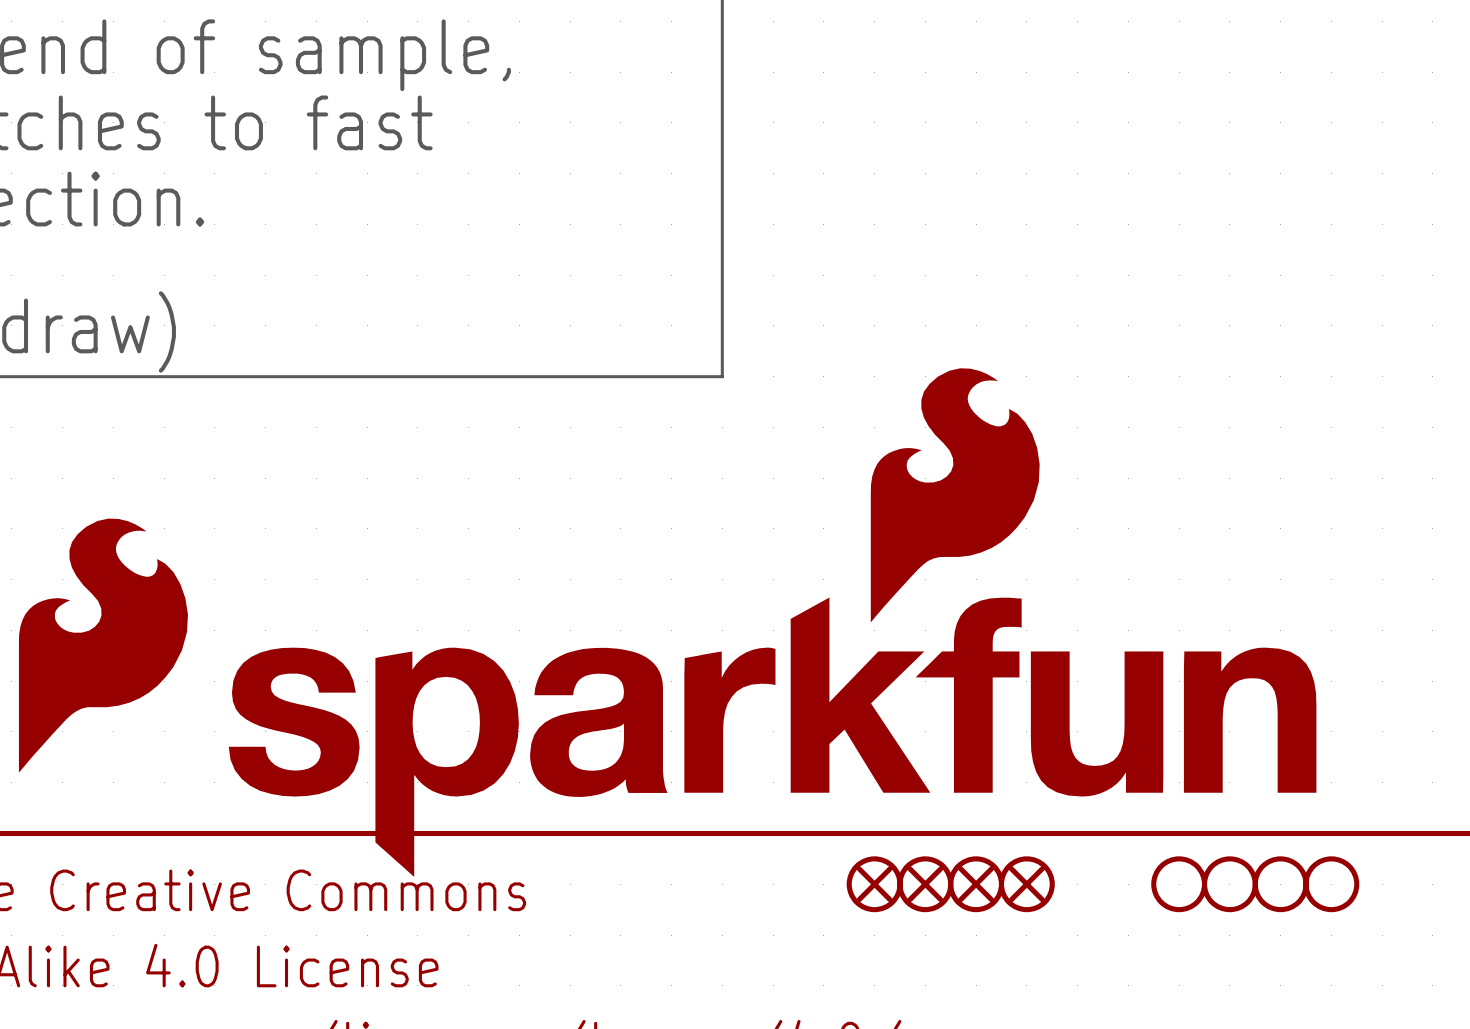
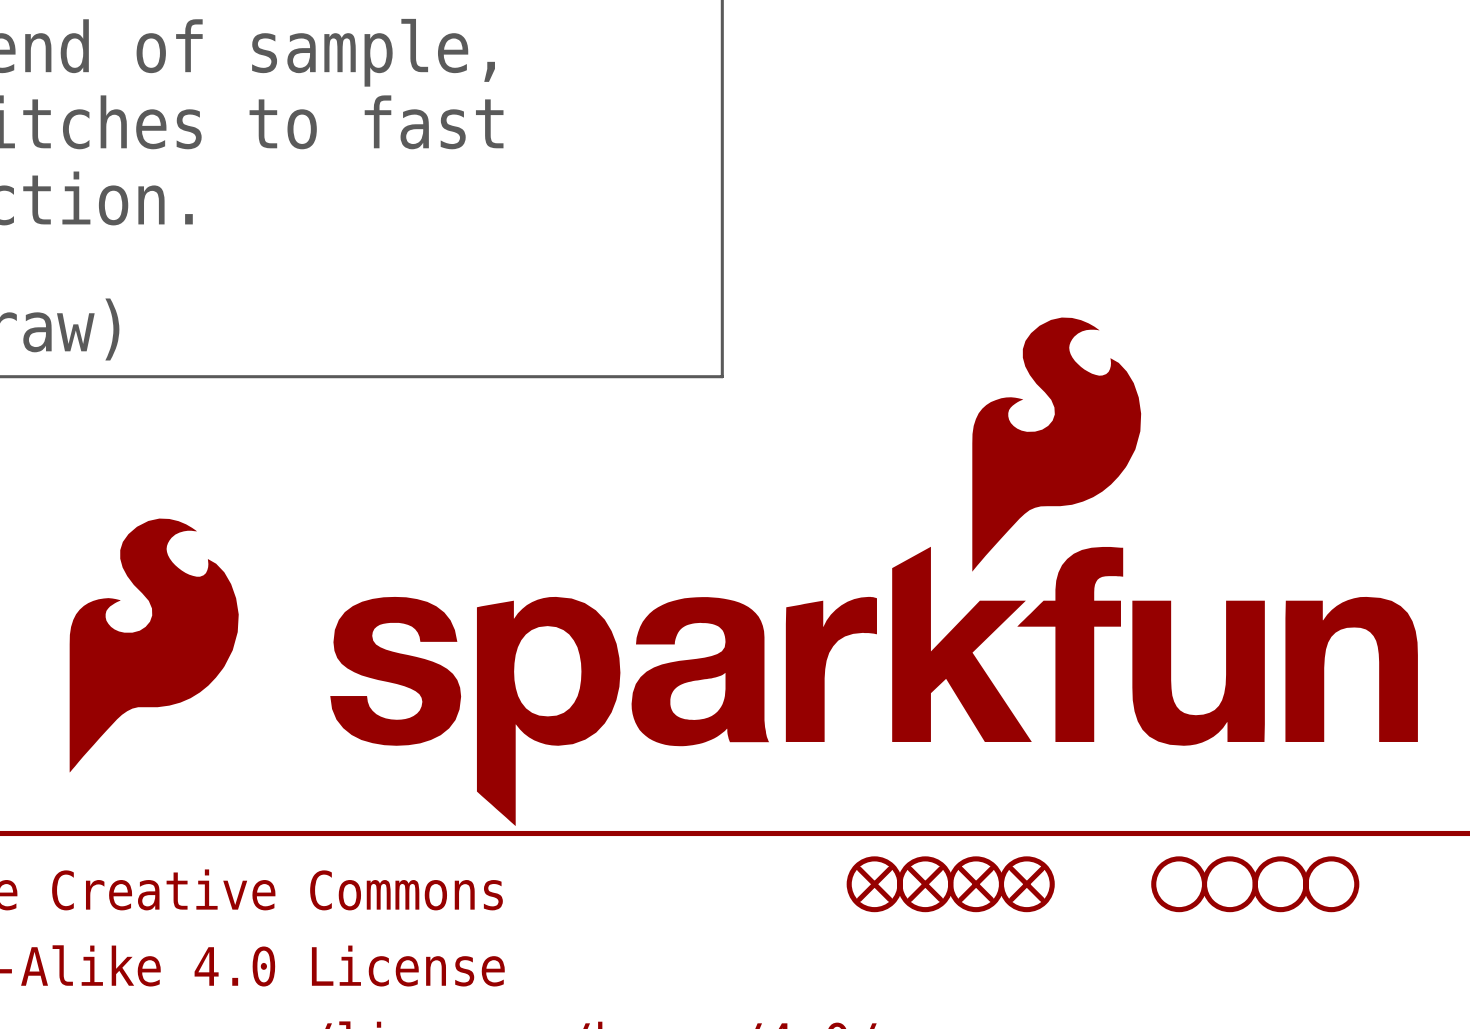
part position: (772, 622) -> (874, 571)
part position: (103, 645) -> (154, 645)

